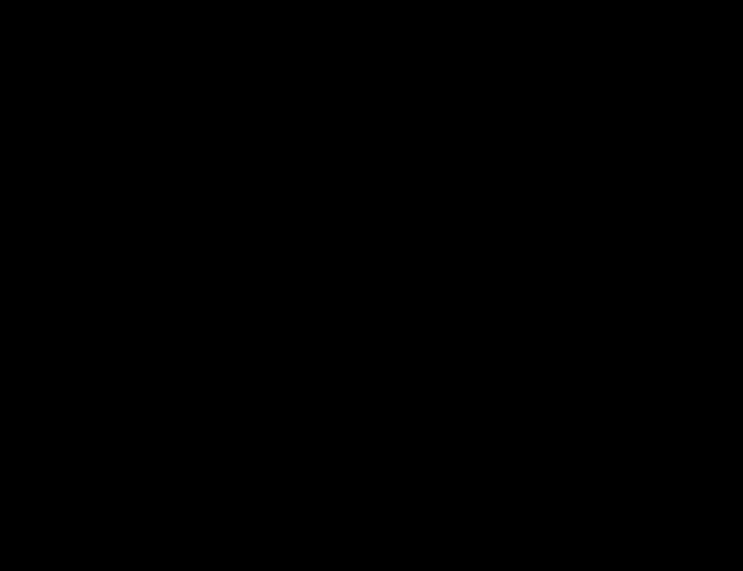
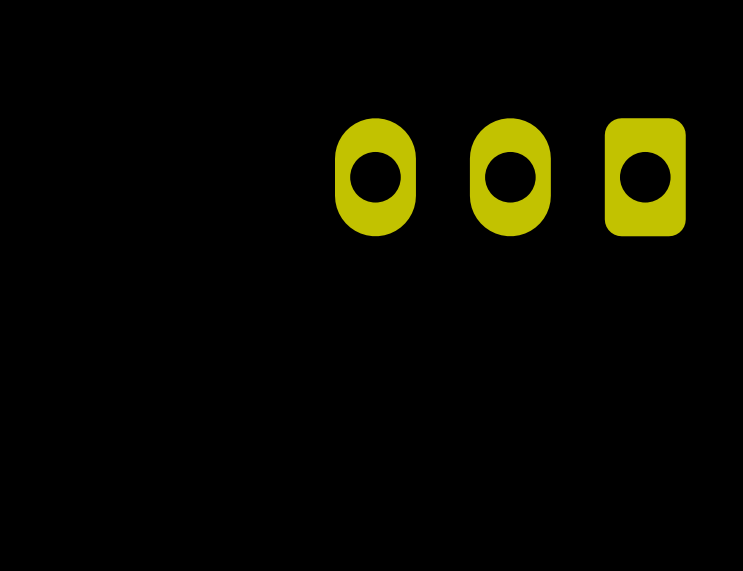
part: none -> (510, 177)

